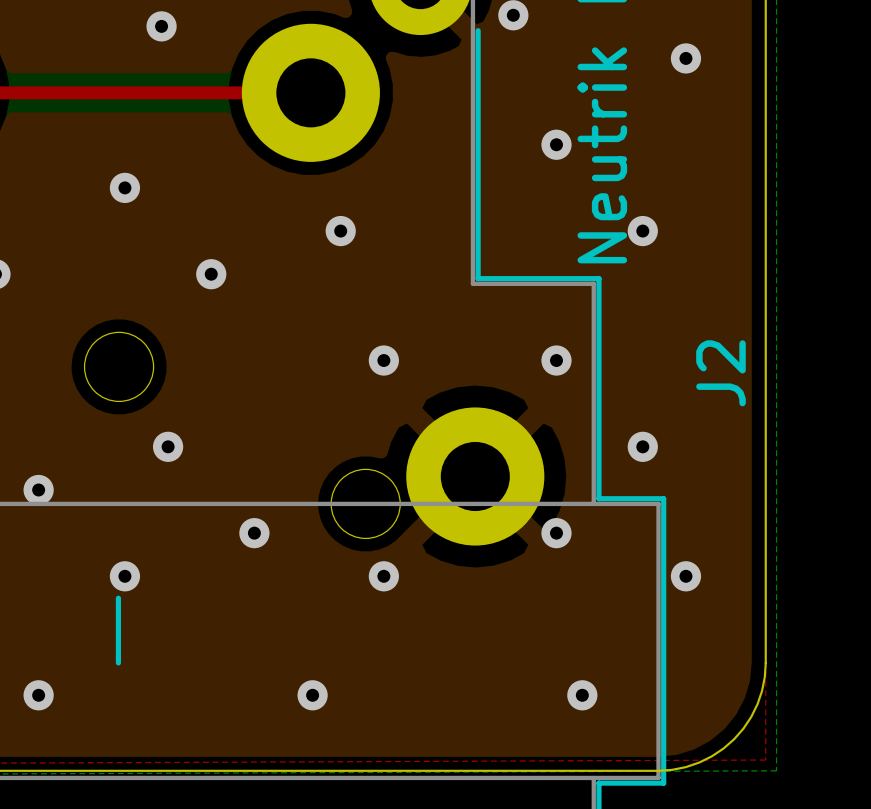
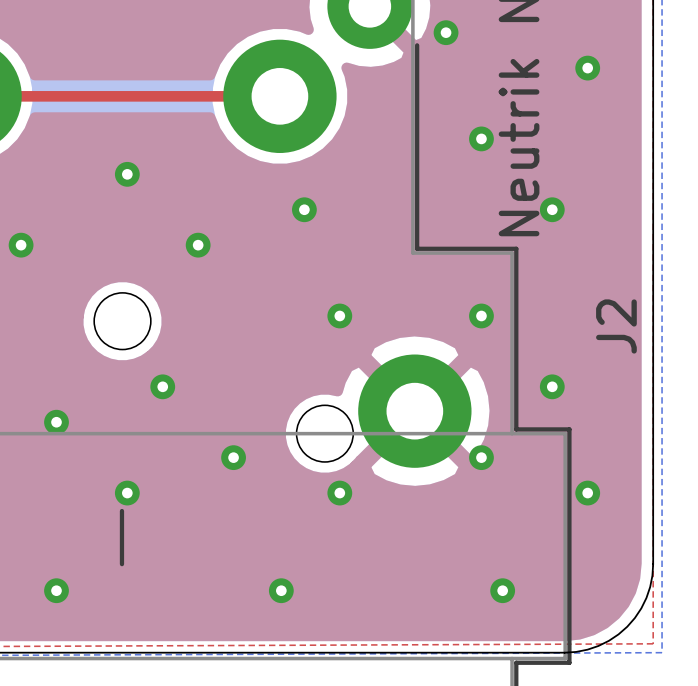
via: (161, 26) -> none

